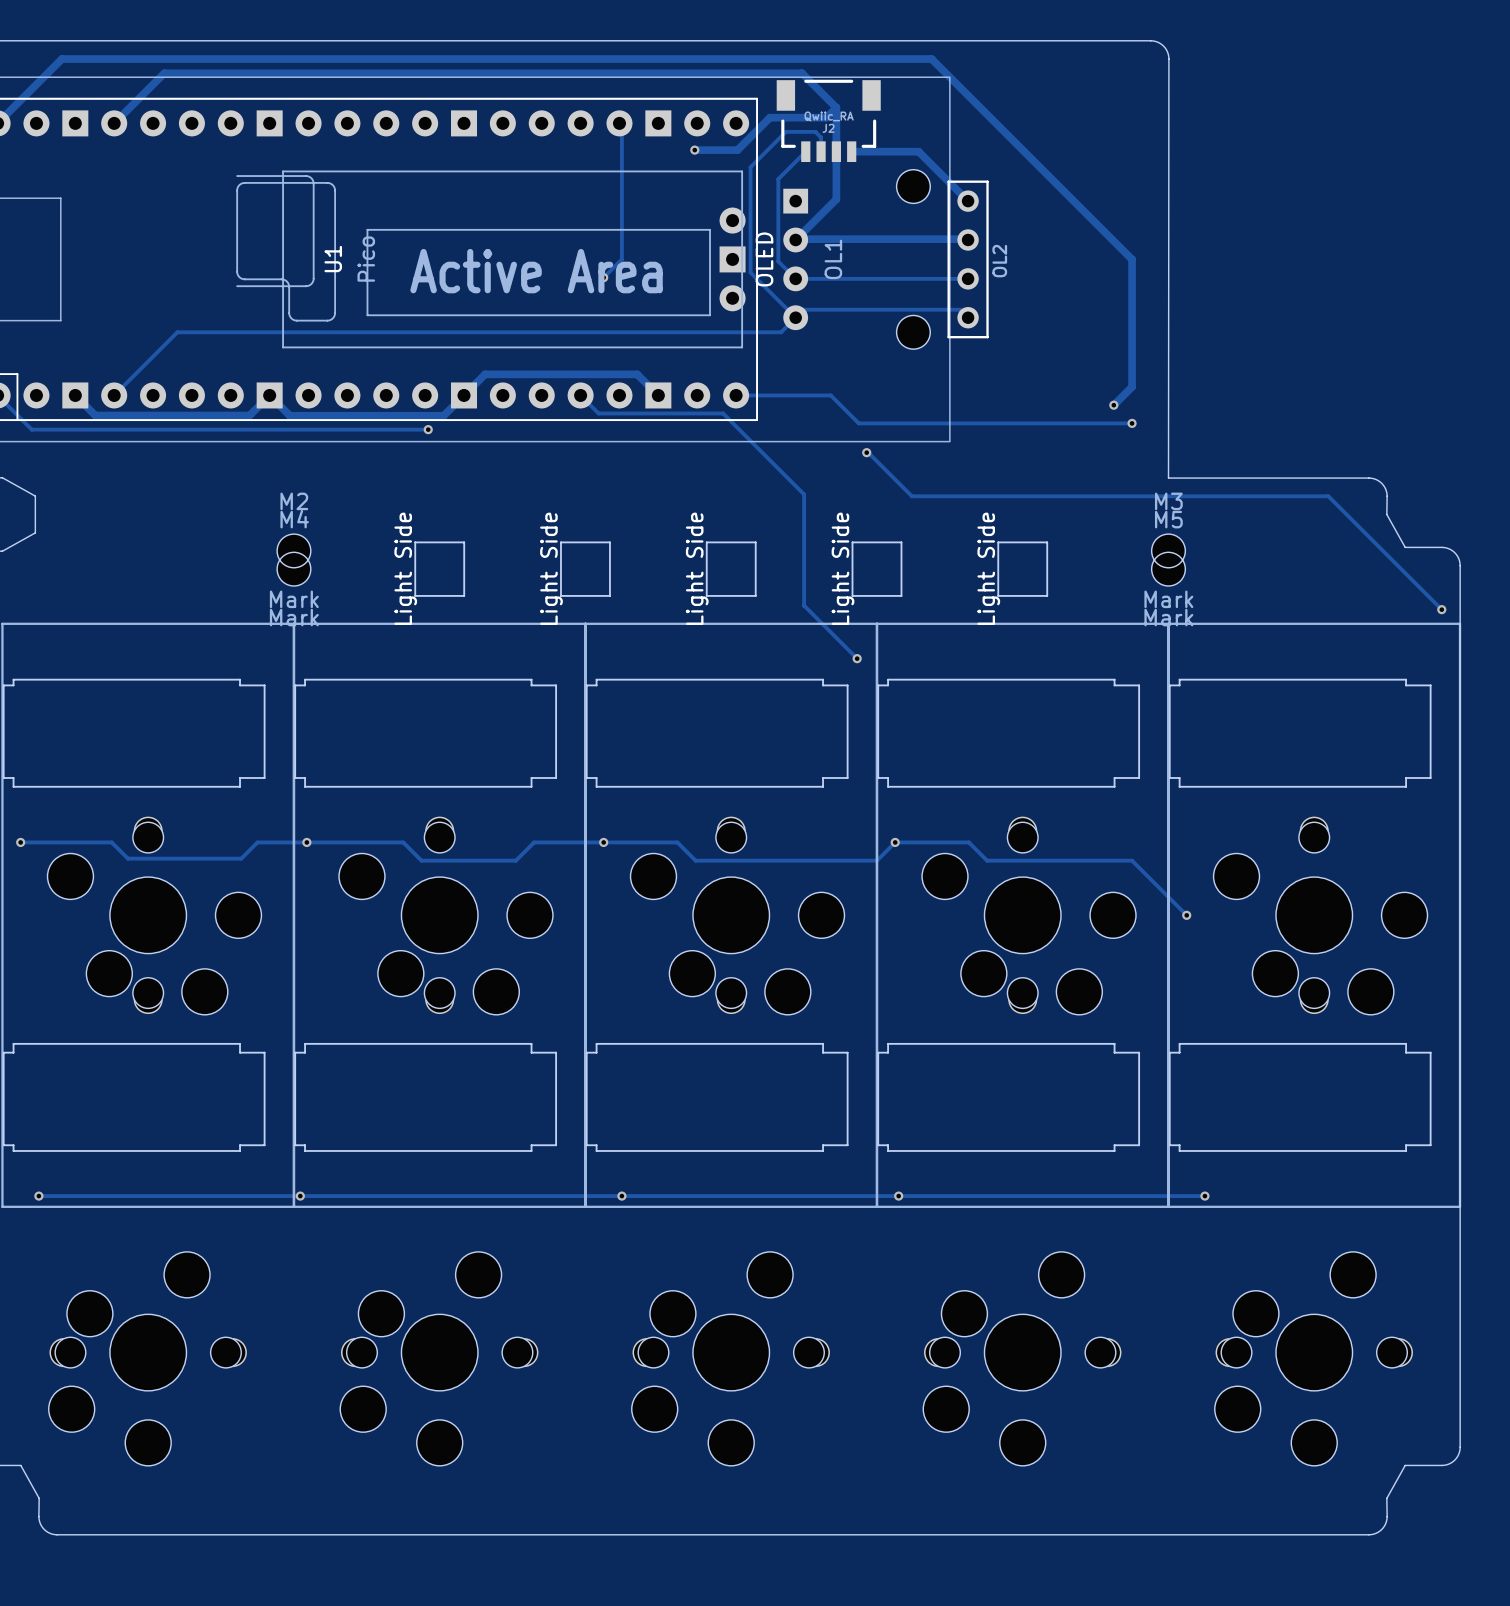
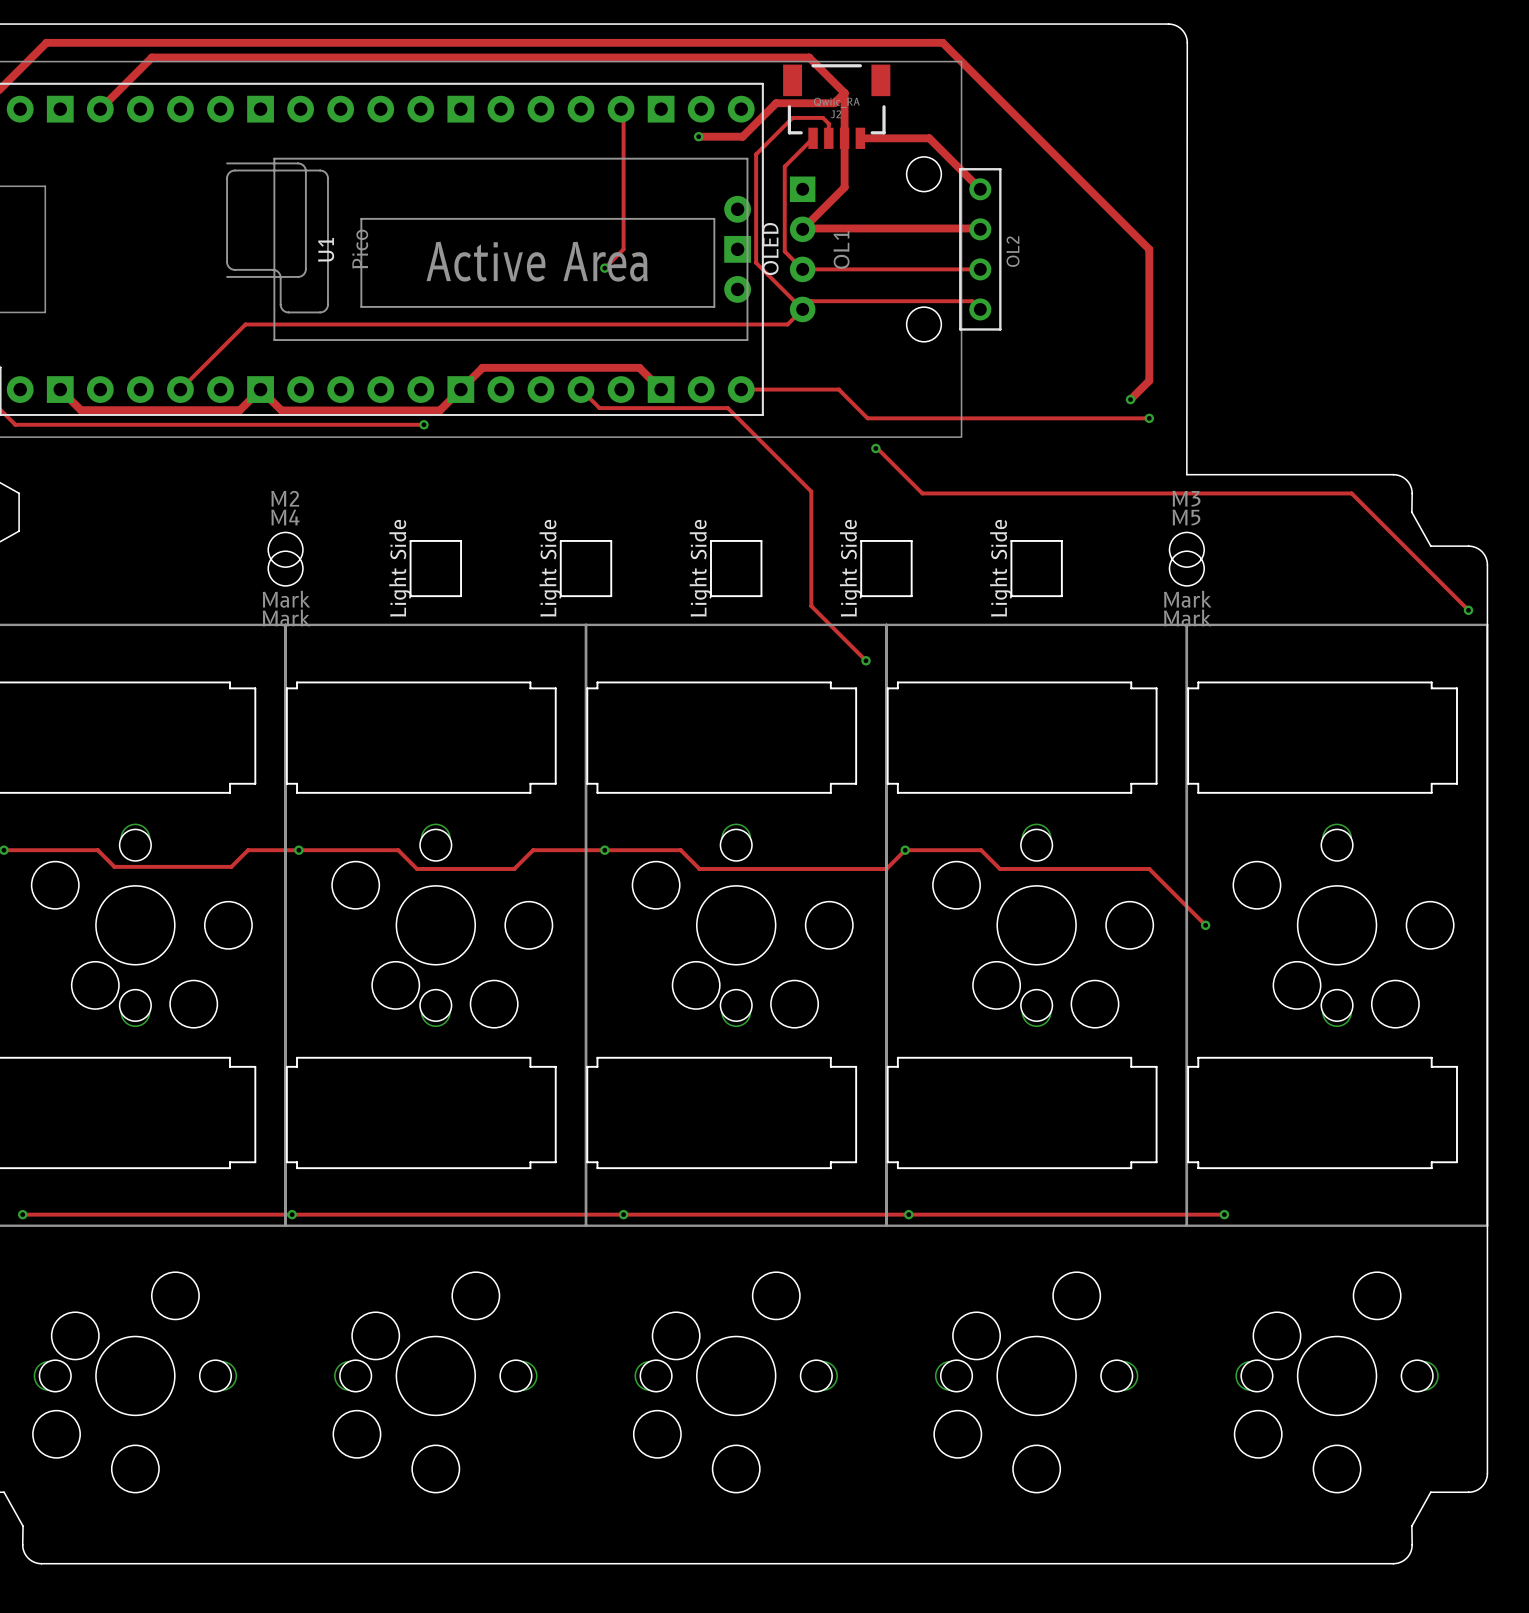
track: (255, 332) (177, 332) (114, 395) -> (245, 324) (180, 389)

